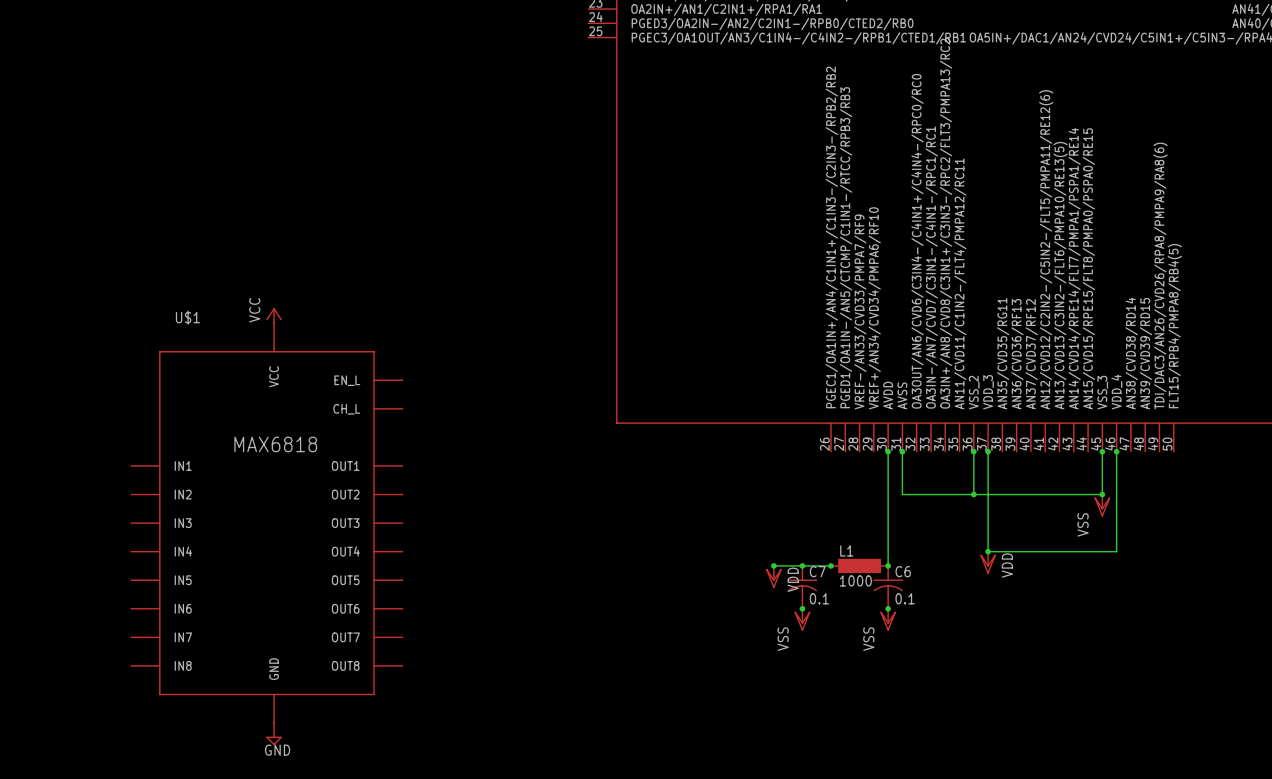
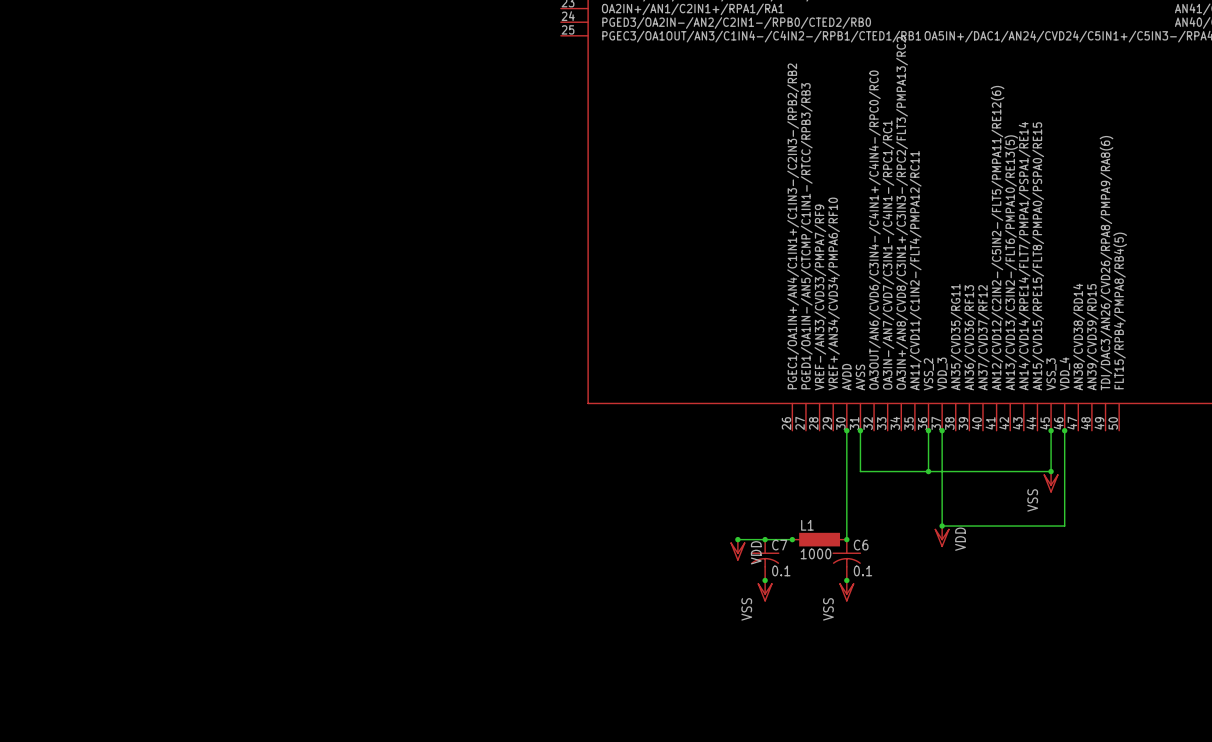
power symbol: VCC (274, 315) -> none
U$1: MAX6818 (266, 523) -> none
power symbol: GND (274, 734) -> none

